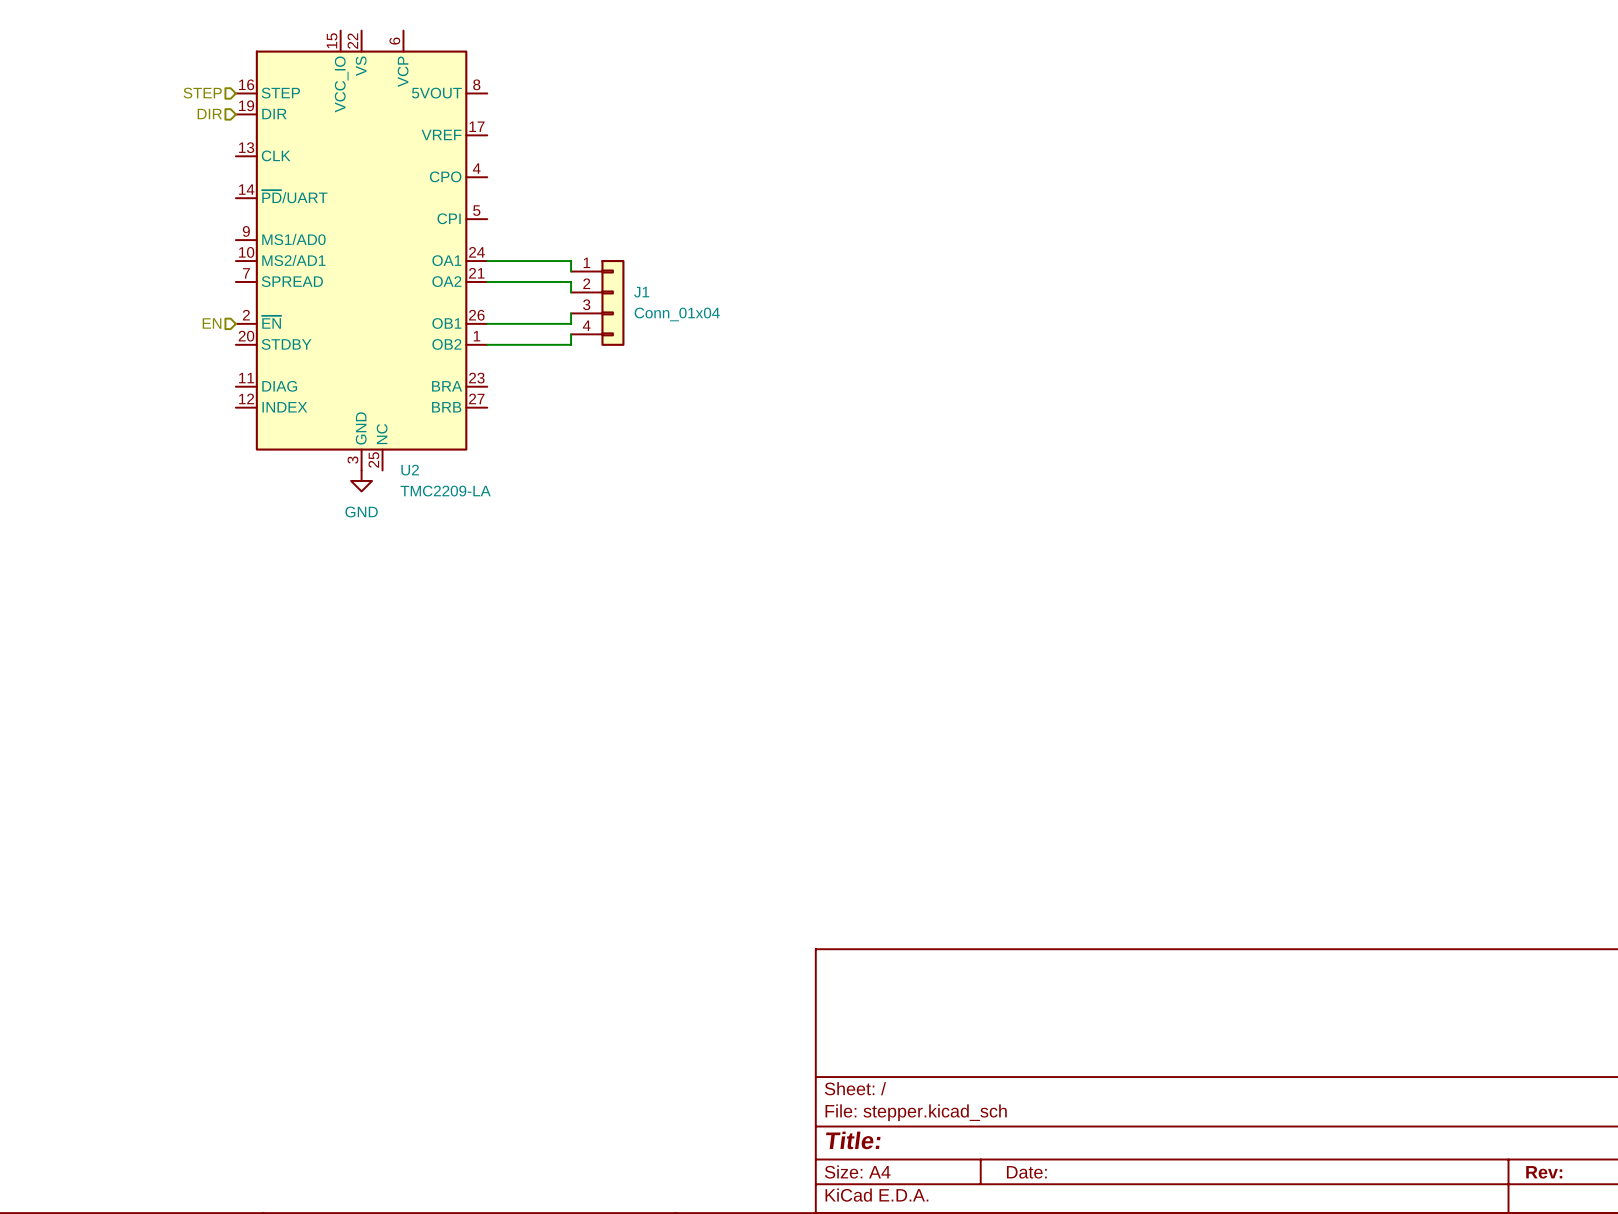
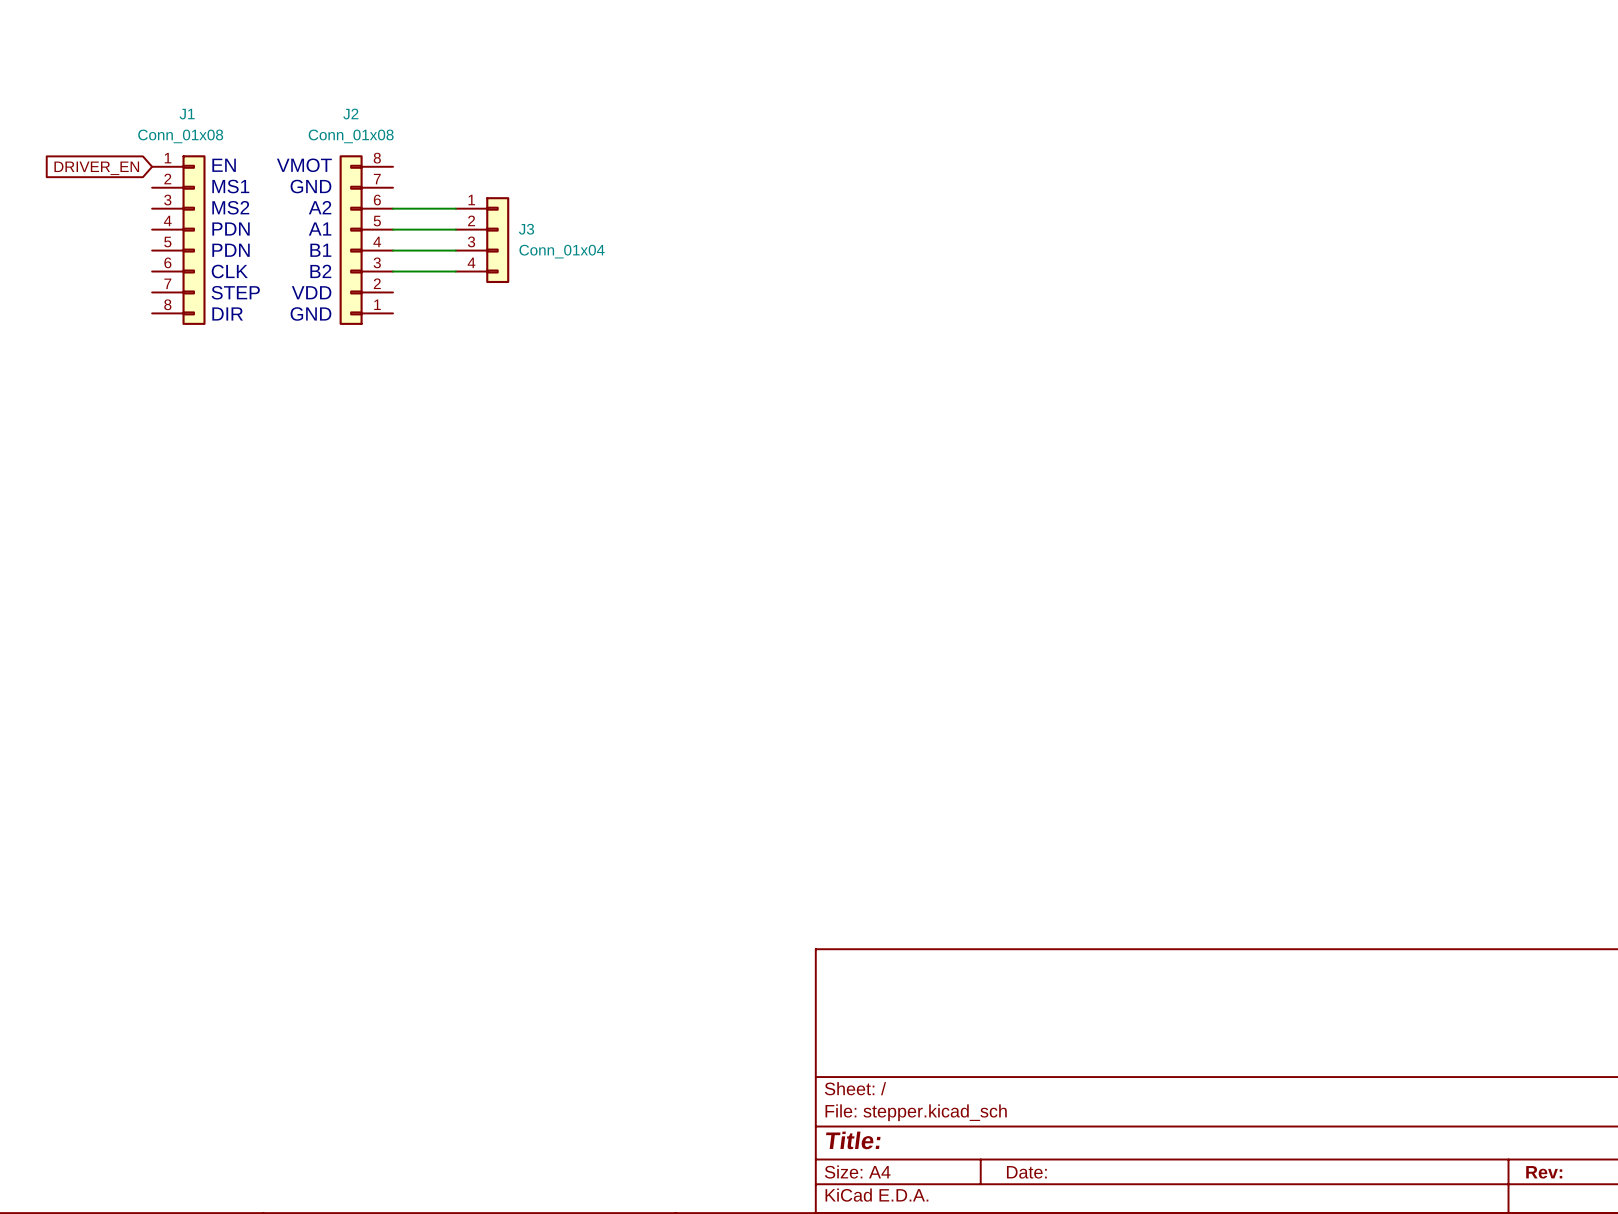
hierarchical label: STEP (202, 93) -> none
hierarchical label: DIR (209, 114) -> none
text: none -> EN (224, 165)
text: none -> VMOT (304, 165)
global label: none -> DRIVER_EN (96, 168)
text: none -> MS1 (230, 186)
text: none -> GND (310, 186)
text: none -> MS2 (230, 207)
text: none -> A2 (320, 207)
text: none -> PDN (231, 229)
text: none -> A1 (320, 229)
J2: none -> Conn_01x08 (366, 240)
J3: none -> Conn_01x04 (482, 240)
text: none -> PDN (231, 250)
text: none -> B1 (320, 250)
U2: TMC2209-LA (361, 250) -> none
J1 symbol: [571, 259, 625, 346] -> [152, 155, 206, 325]
wire: (487, 261) (571, 261) (571, 271) -> none
text: none -> CLK (229, 271)
text: none -> B2 (320, 271)
wire: (487, 281) (571, 281) (571, 292) -> none
text: none -> STEP (235, 292)
text: none -> VDD (311, 292)
J1 name position: J1 (641, 292) -> J1 (187, 114)
text: none -> DIR (227, 313)
text: none -> GND (310, 313)
wire: (571, 313) (571, 323) (487, 323) -> none
J1 value: Conn_01x04 (677, 314) -> Conn_01x08 (180, 136)
hierarchical label: EN (212, 323) -> none
wire: (571, 334) (571, 344) (487, 344) -> none
power symbol: GND (361, 480) -> none

